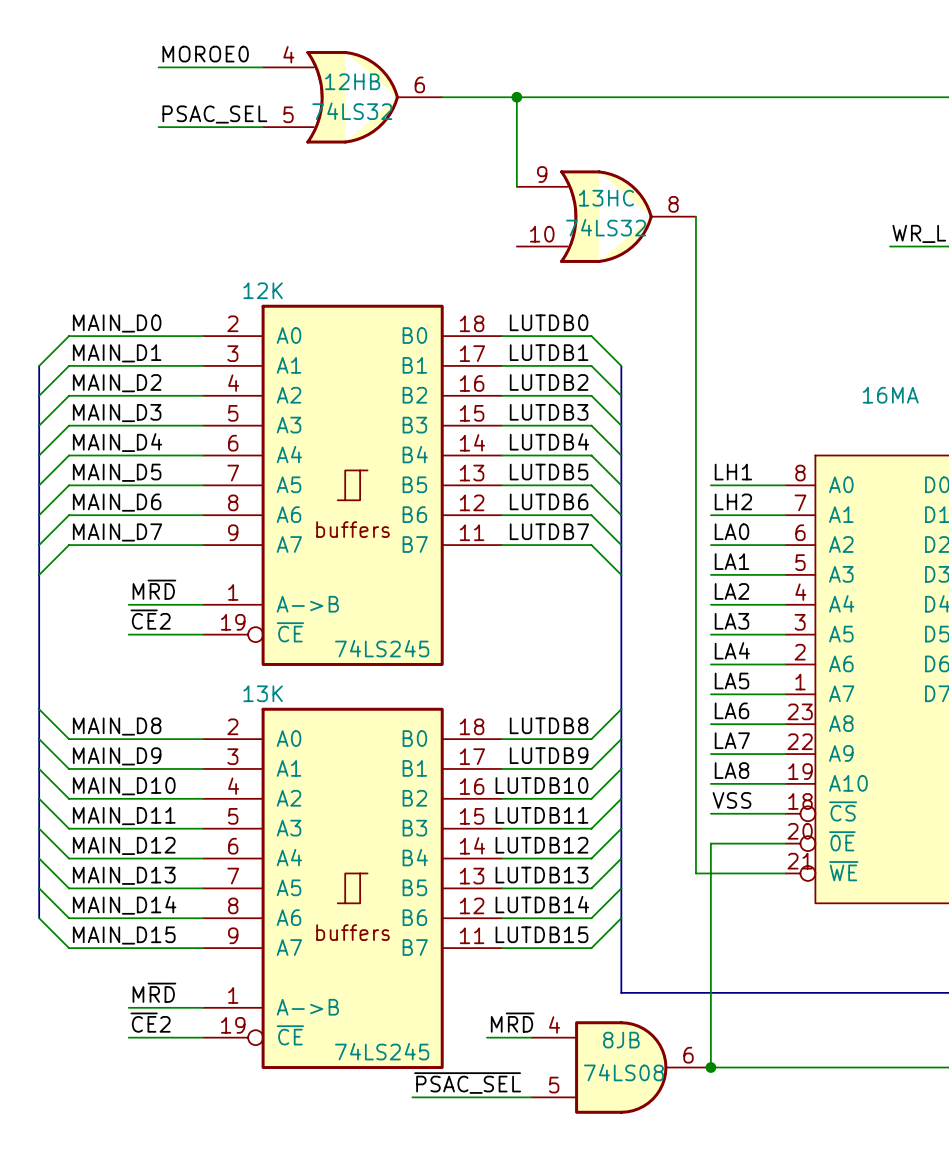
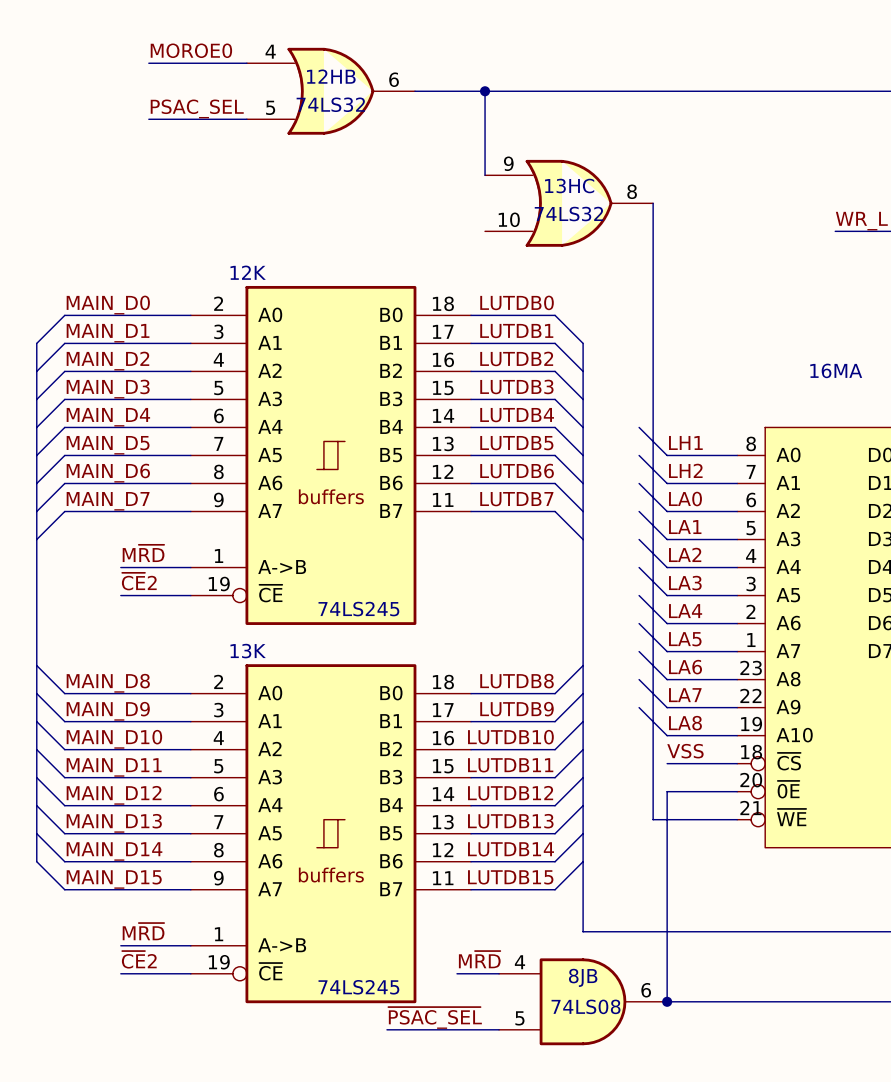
wire: none -> (639, 427) (667, 455)
wire: none -> (639, 455) (667, 483)
wire: none -> (639, 483) (667, 511)
wire: none -> (639, 511) (667, 539)
wire: none -> (639, 539) (667, 567)
wire: none -> (639, 567) (667, 595)
wire: none -> (639, 595) (667, 623)
wire: none -> (639, 623) (667, 651)
wire: none -> (639, 651) (667, 679)
wire: none -> (639, 679) (667, 707)
wire: none -> (639, 707) (667, 735)

